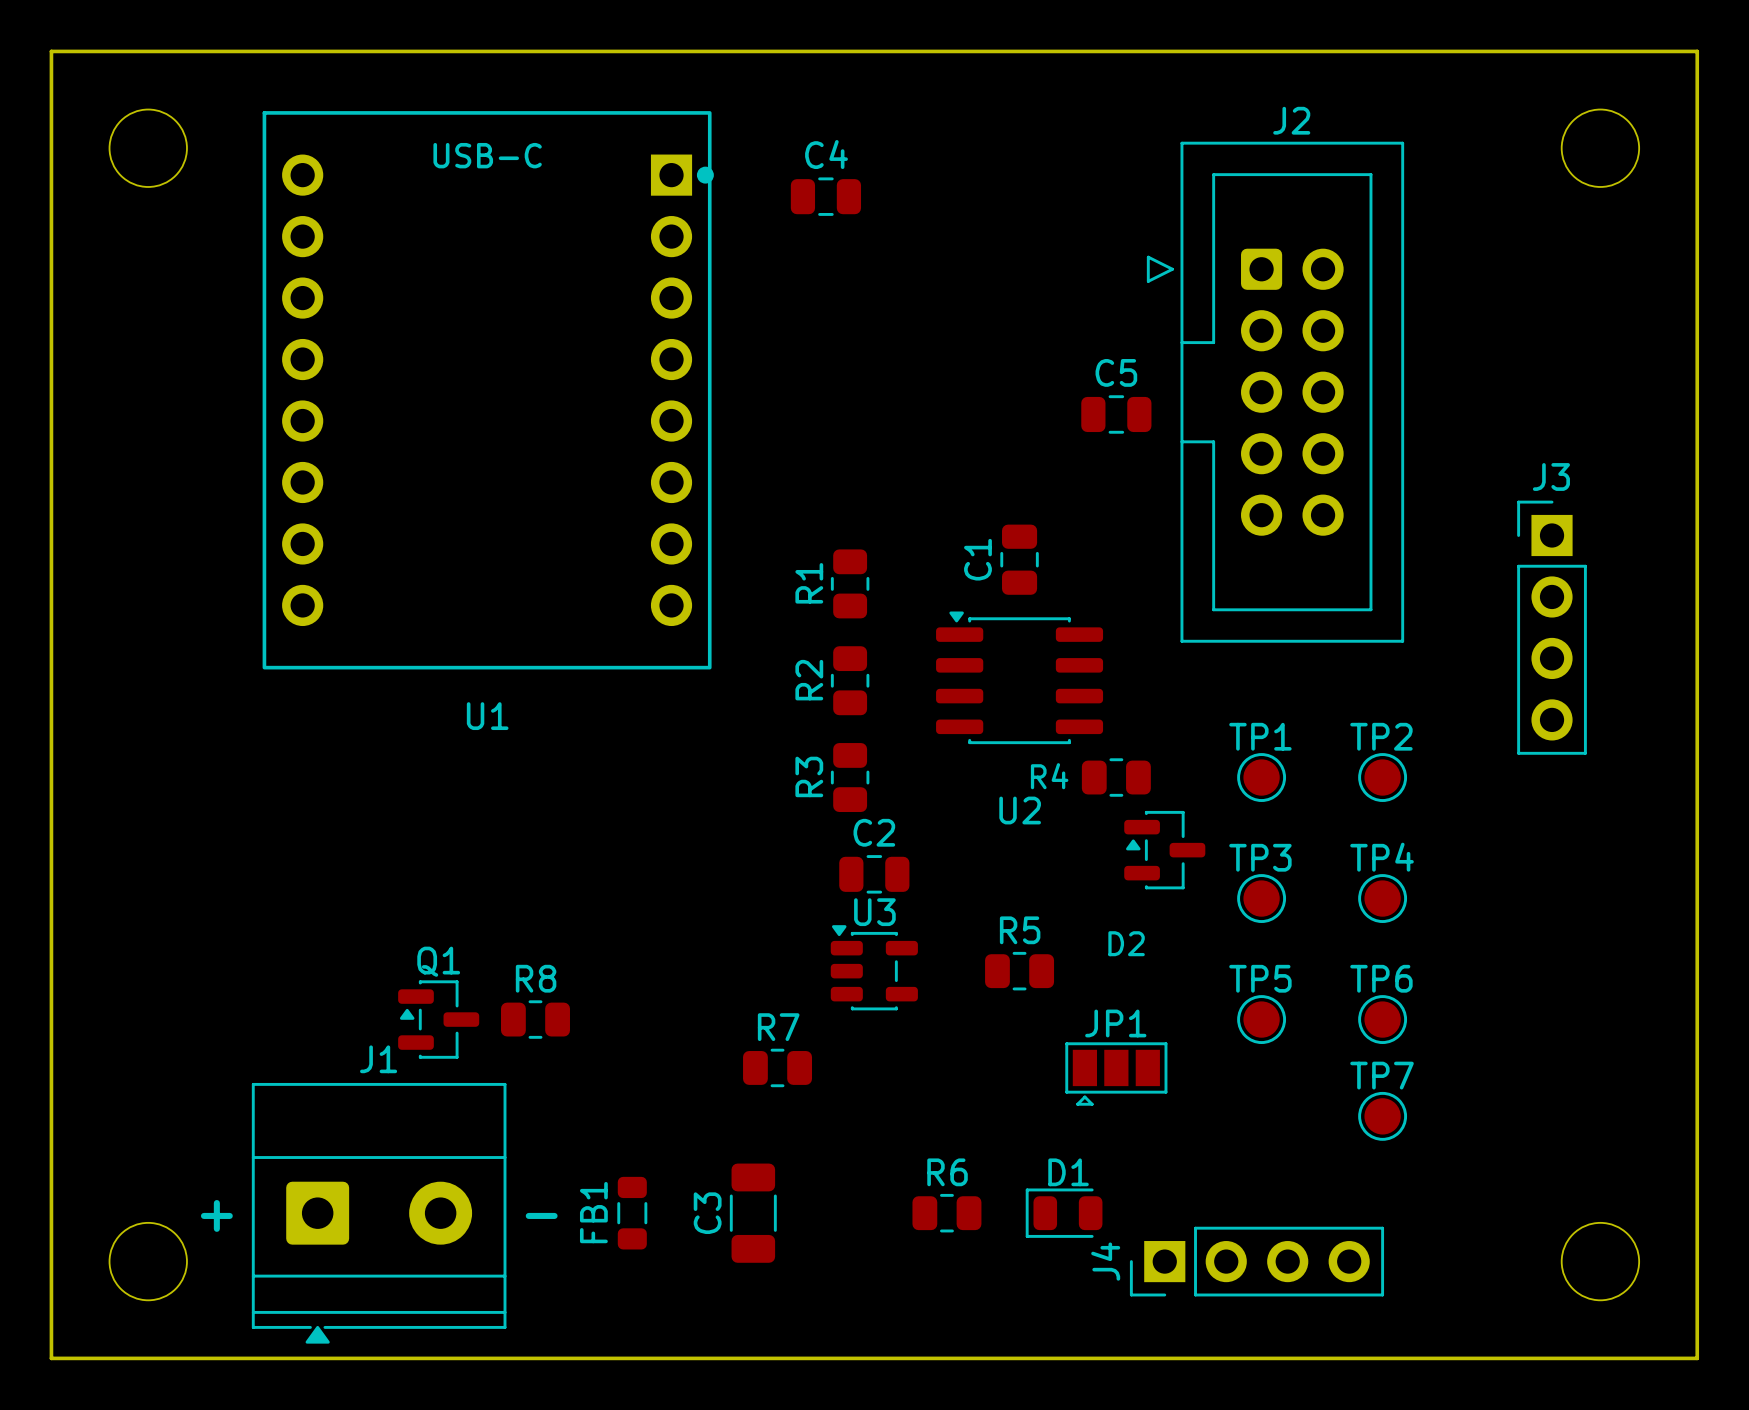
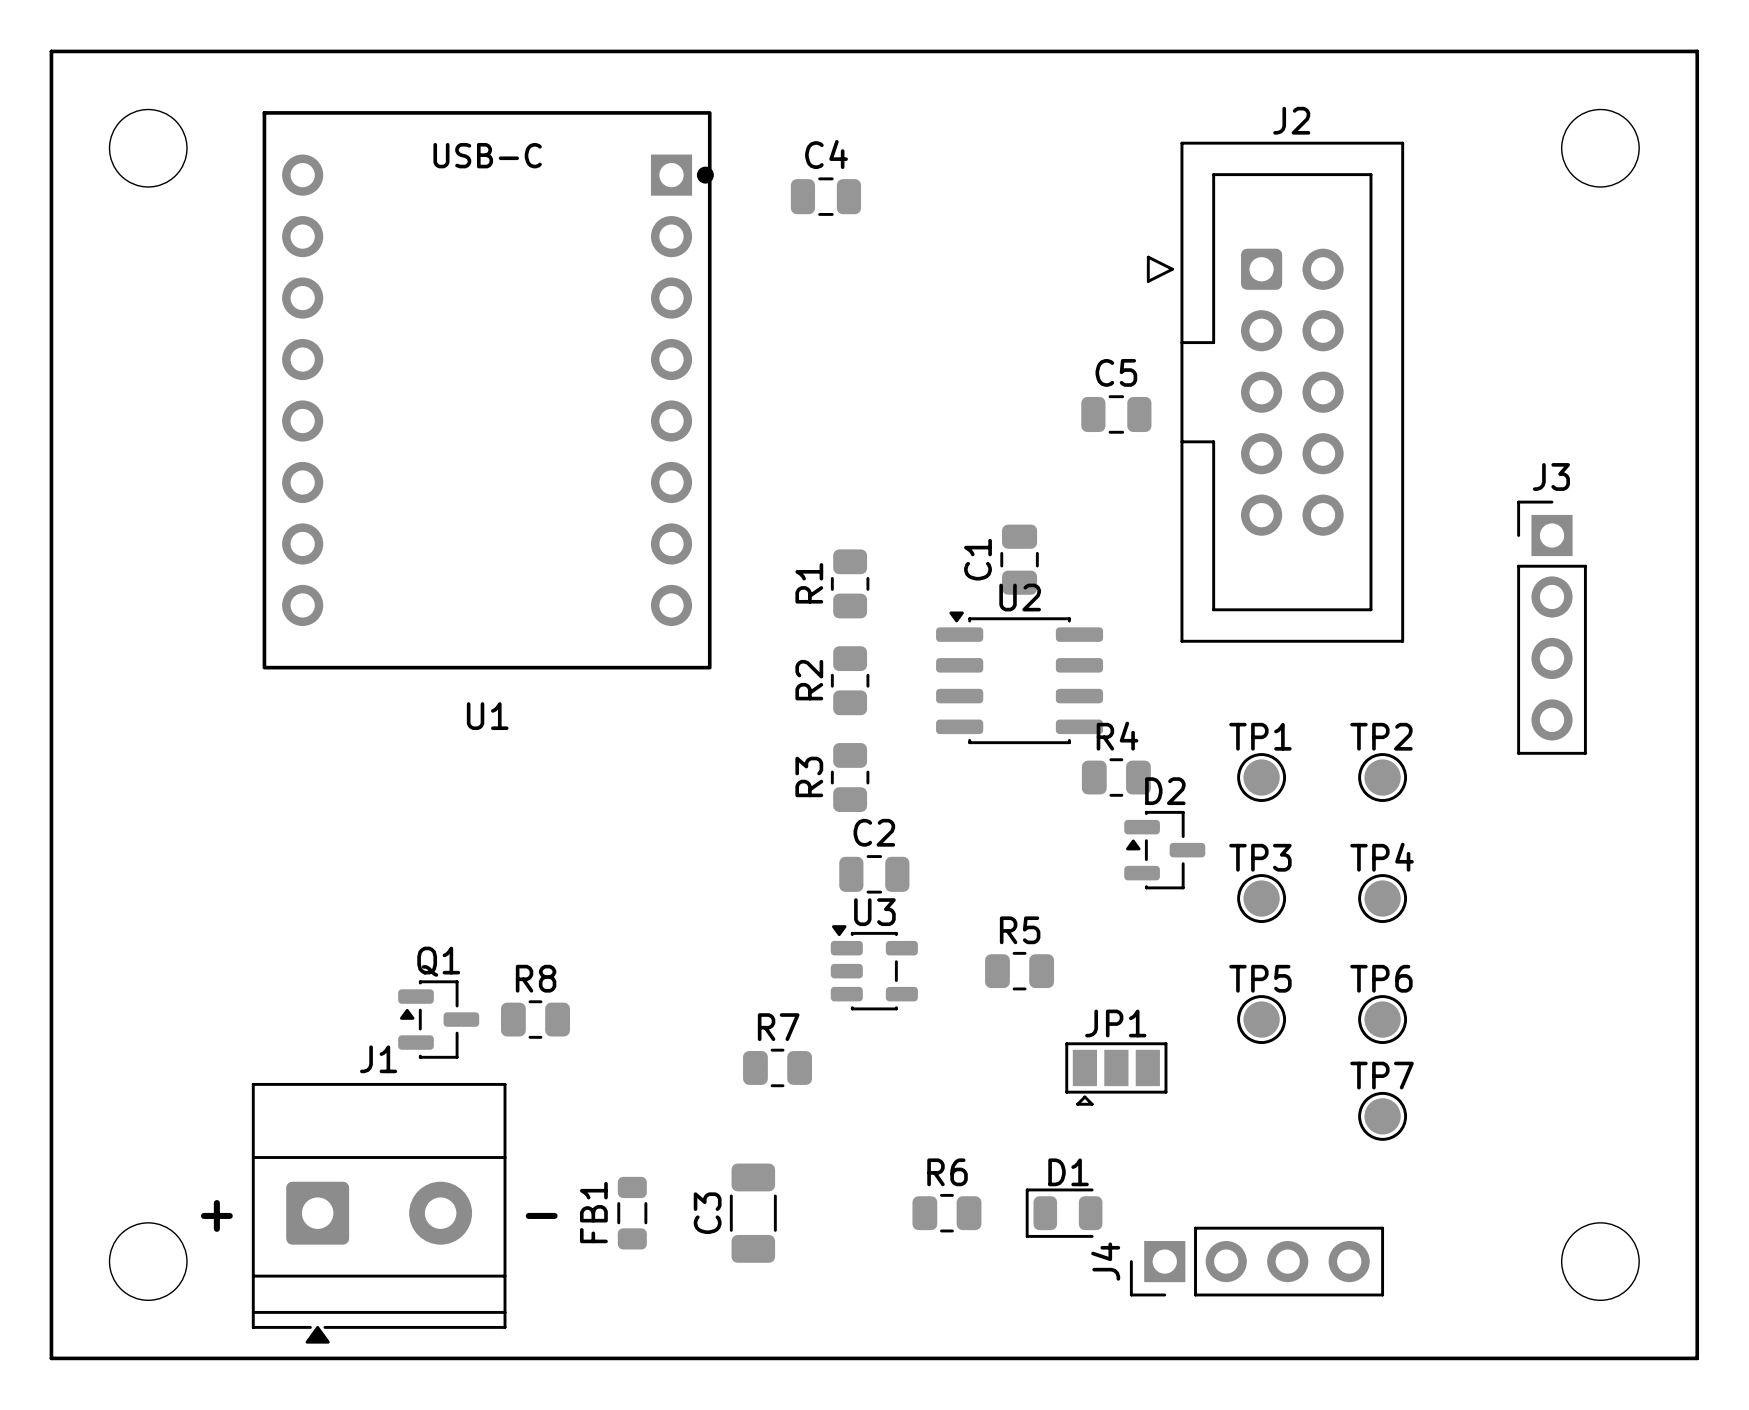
R4 name position: R4 (1049, 776) -> R4 (1117, 736)
U2 name position: U2 (1020, 810) -> U2 (1020, 597)
D2 name position: D2 (1126, 943) -> D2 (1165, 791)

